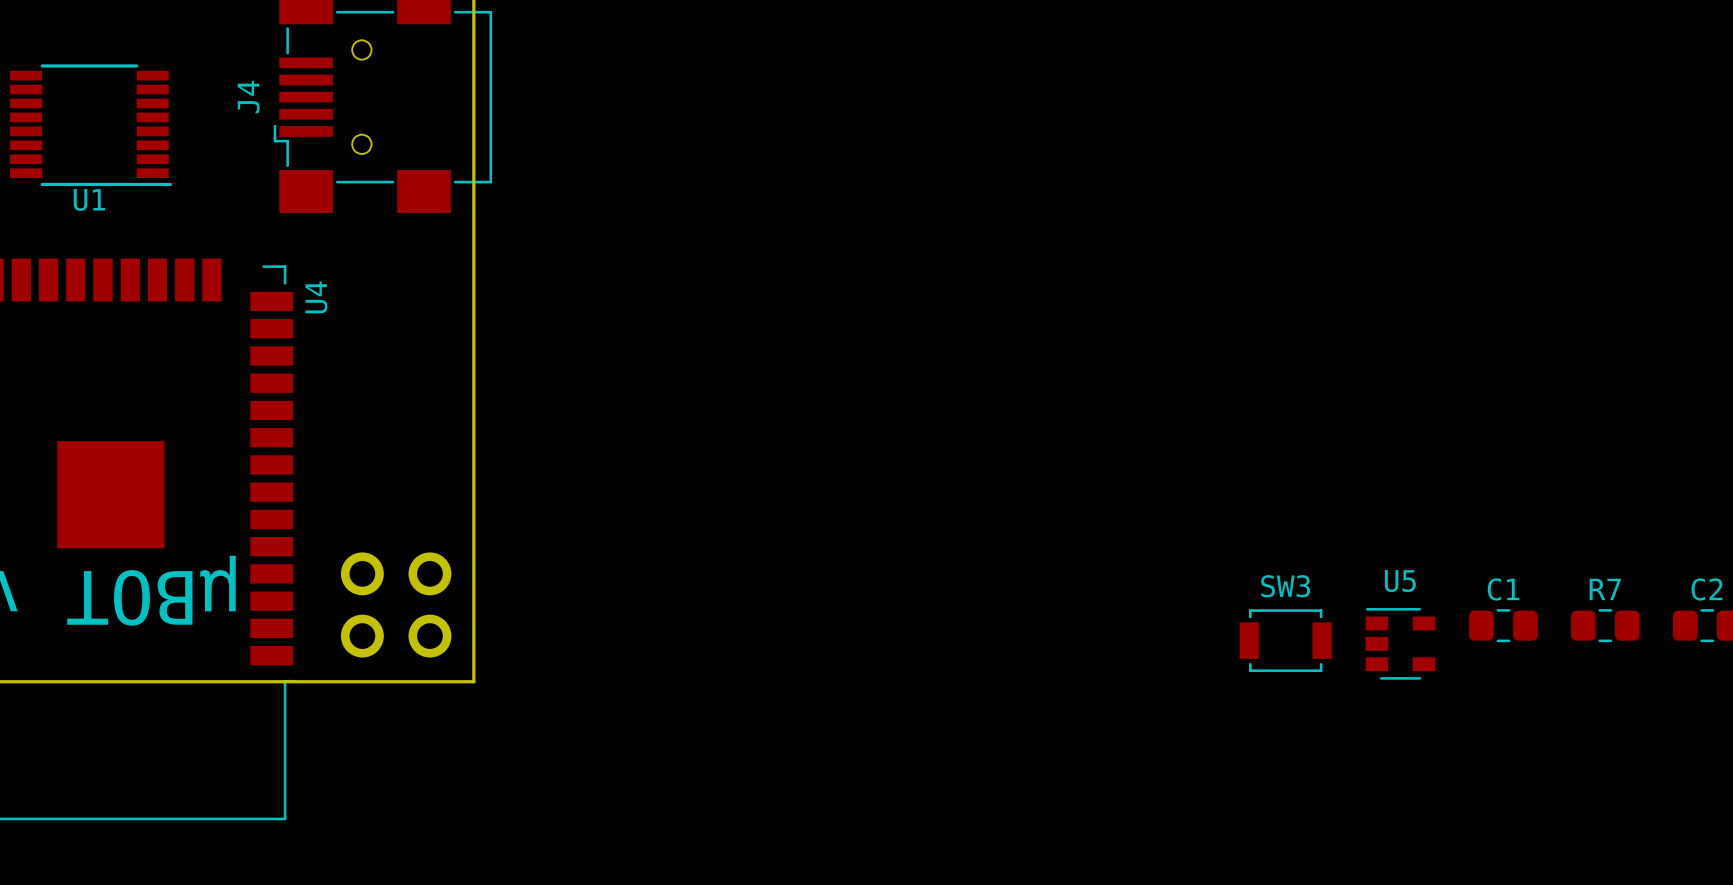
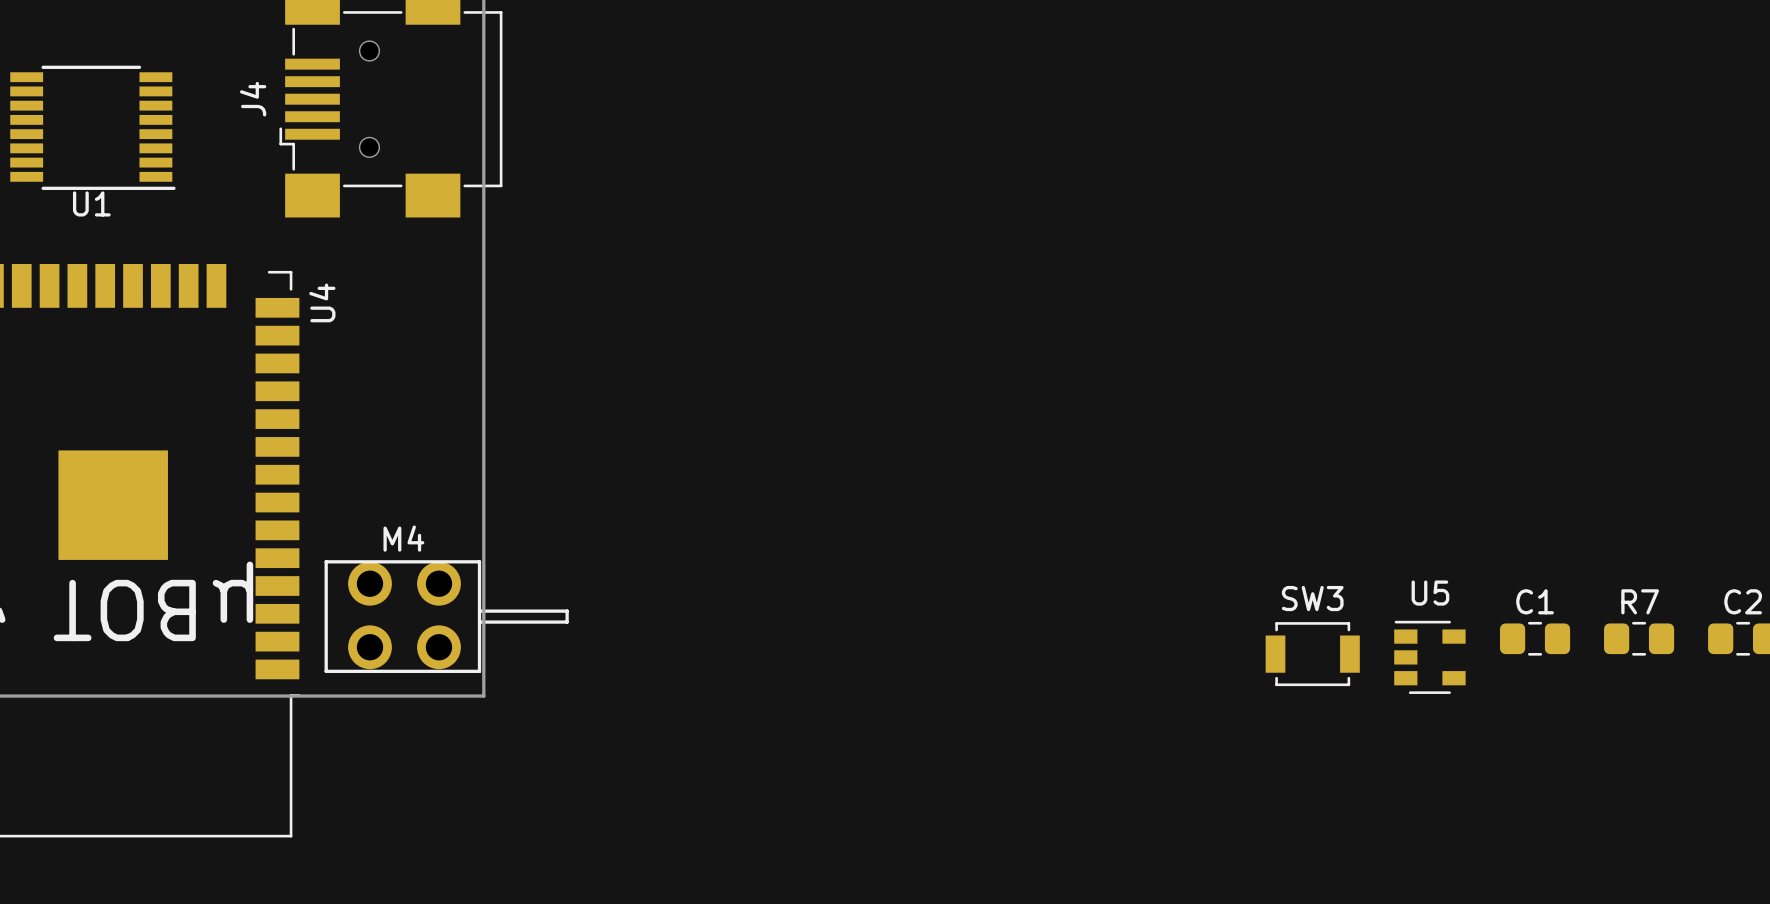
M4 side: bottom (396, 604) -> top (446, 616)

